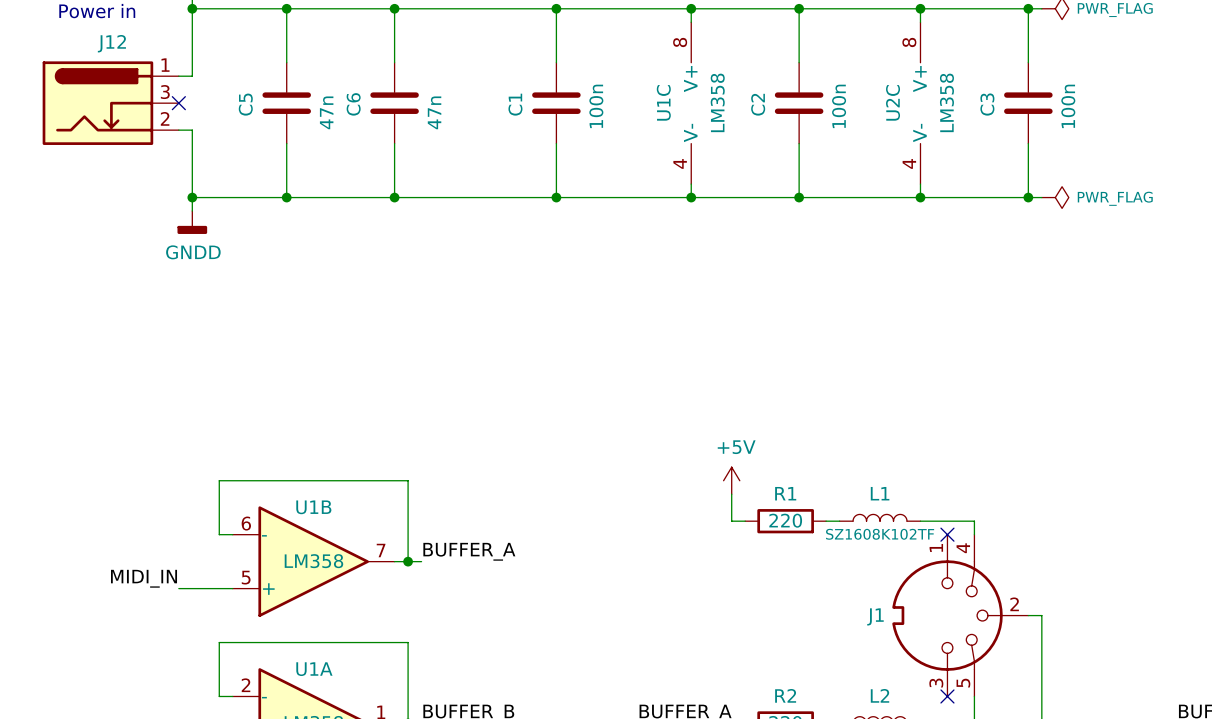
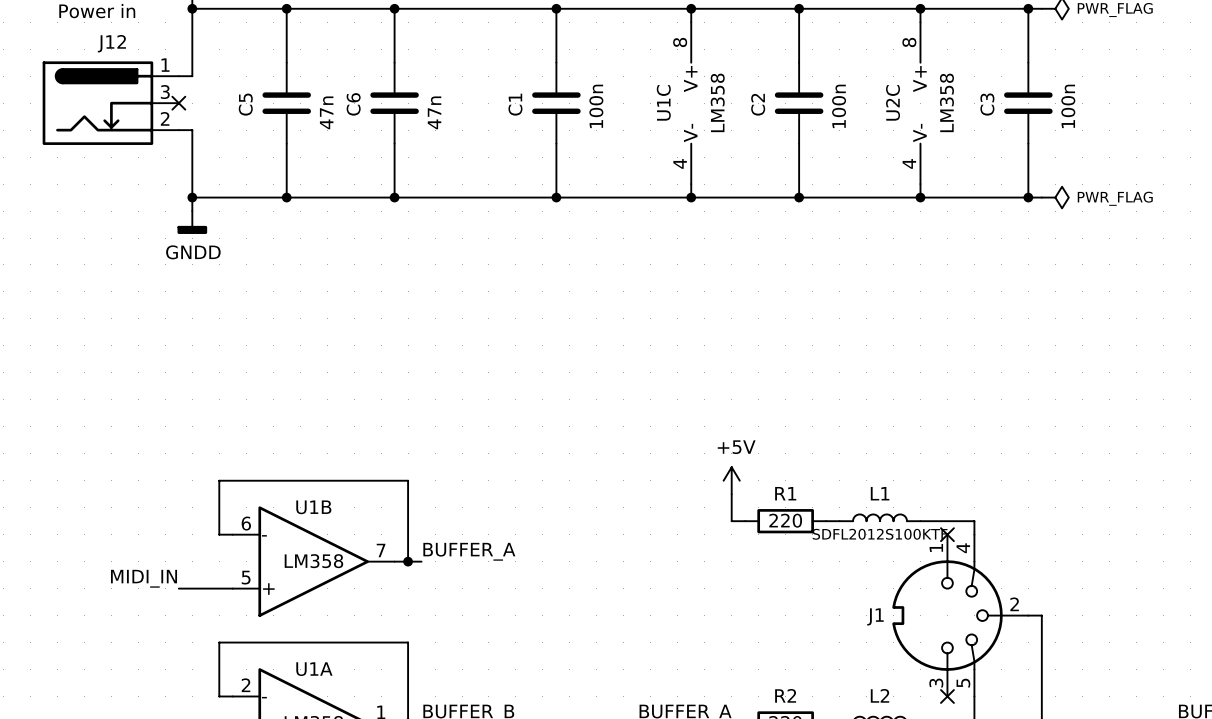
L1 value: SZ1608K102TF (880, 534) -> SDFL2012S100KTF (880, 534)

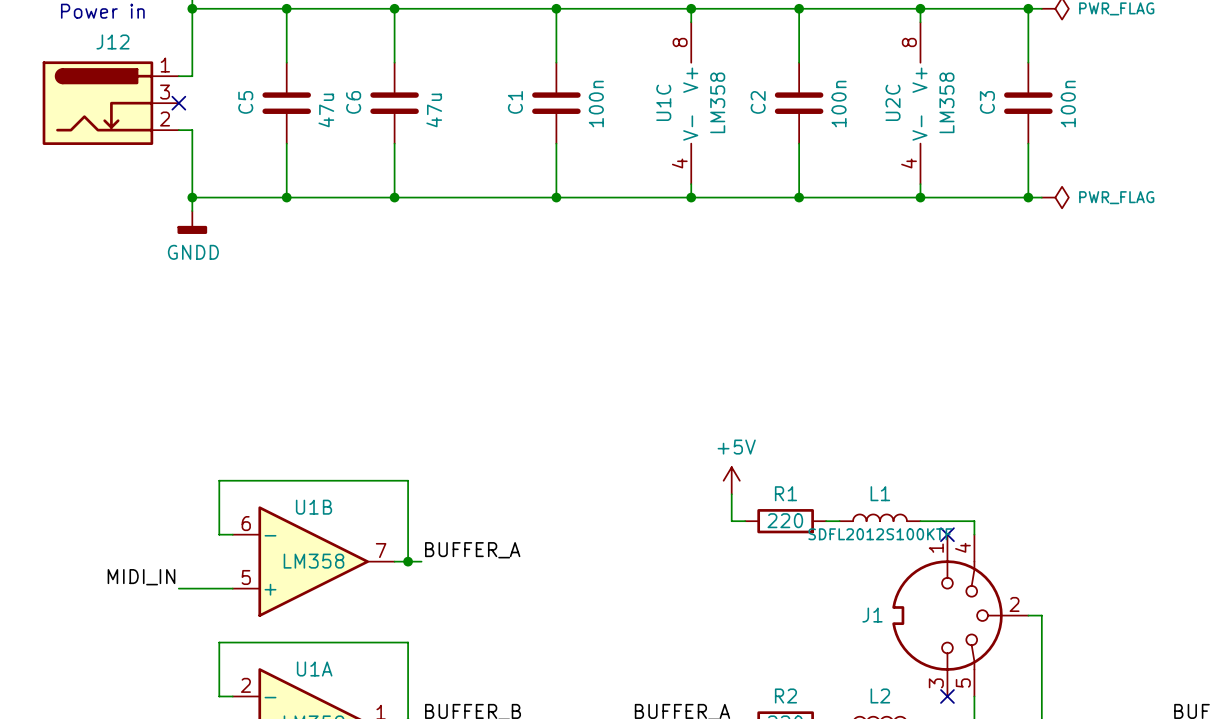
C5 value: 47n (326, 112) -> 47u (326, 110)
C6 value: 47n (434, 112) -> 47u (434, 110)

